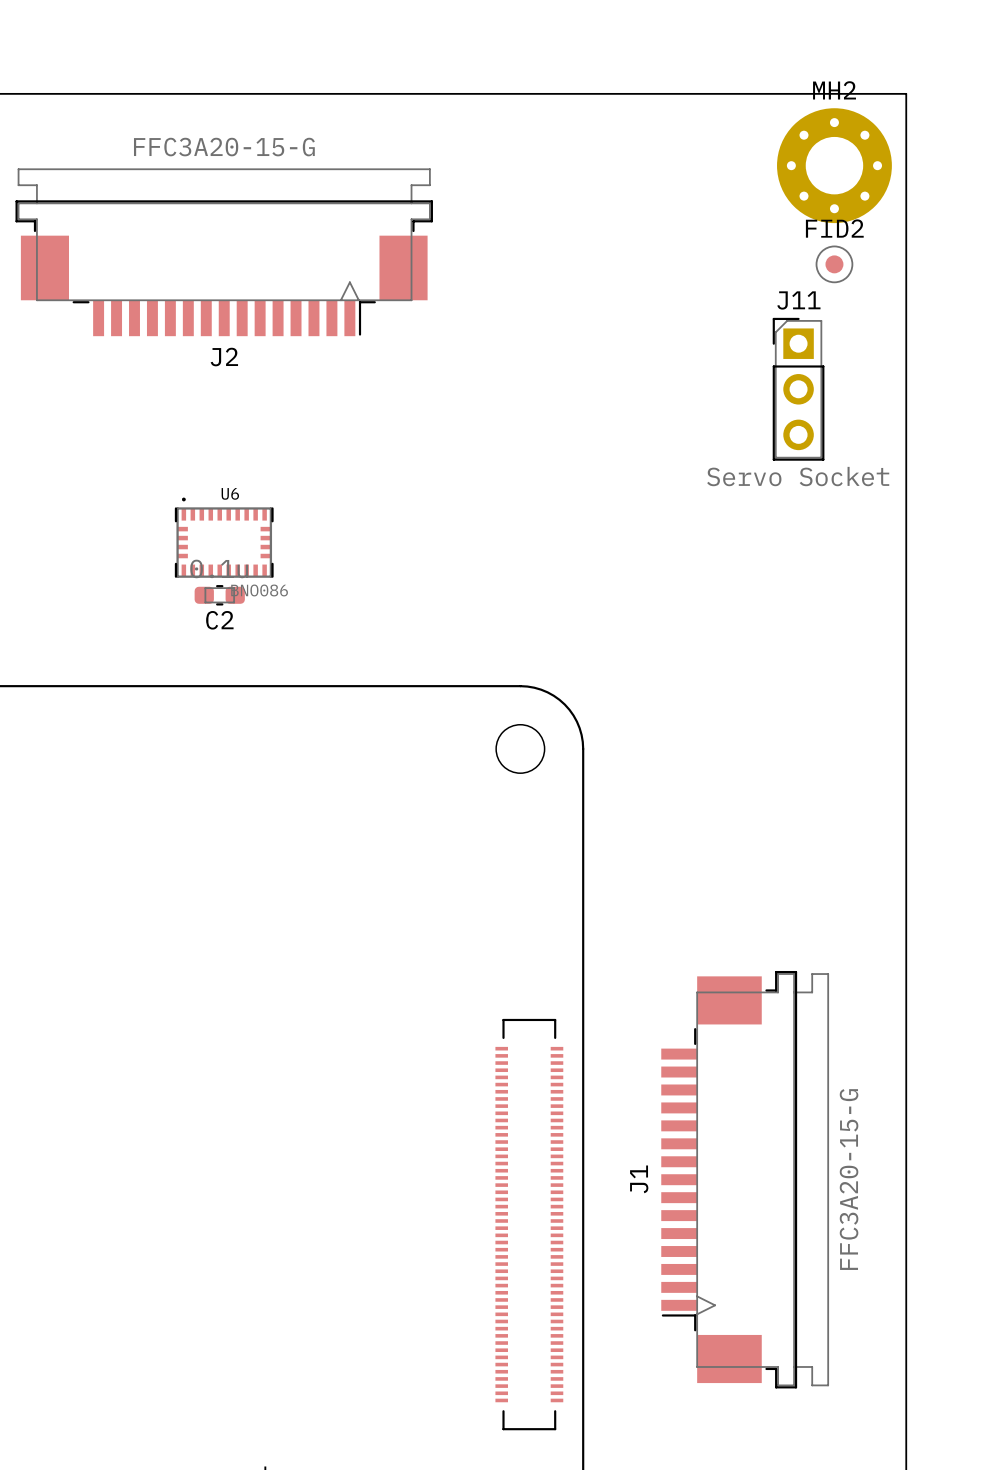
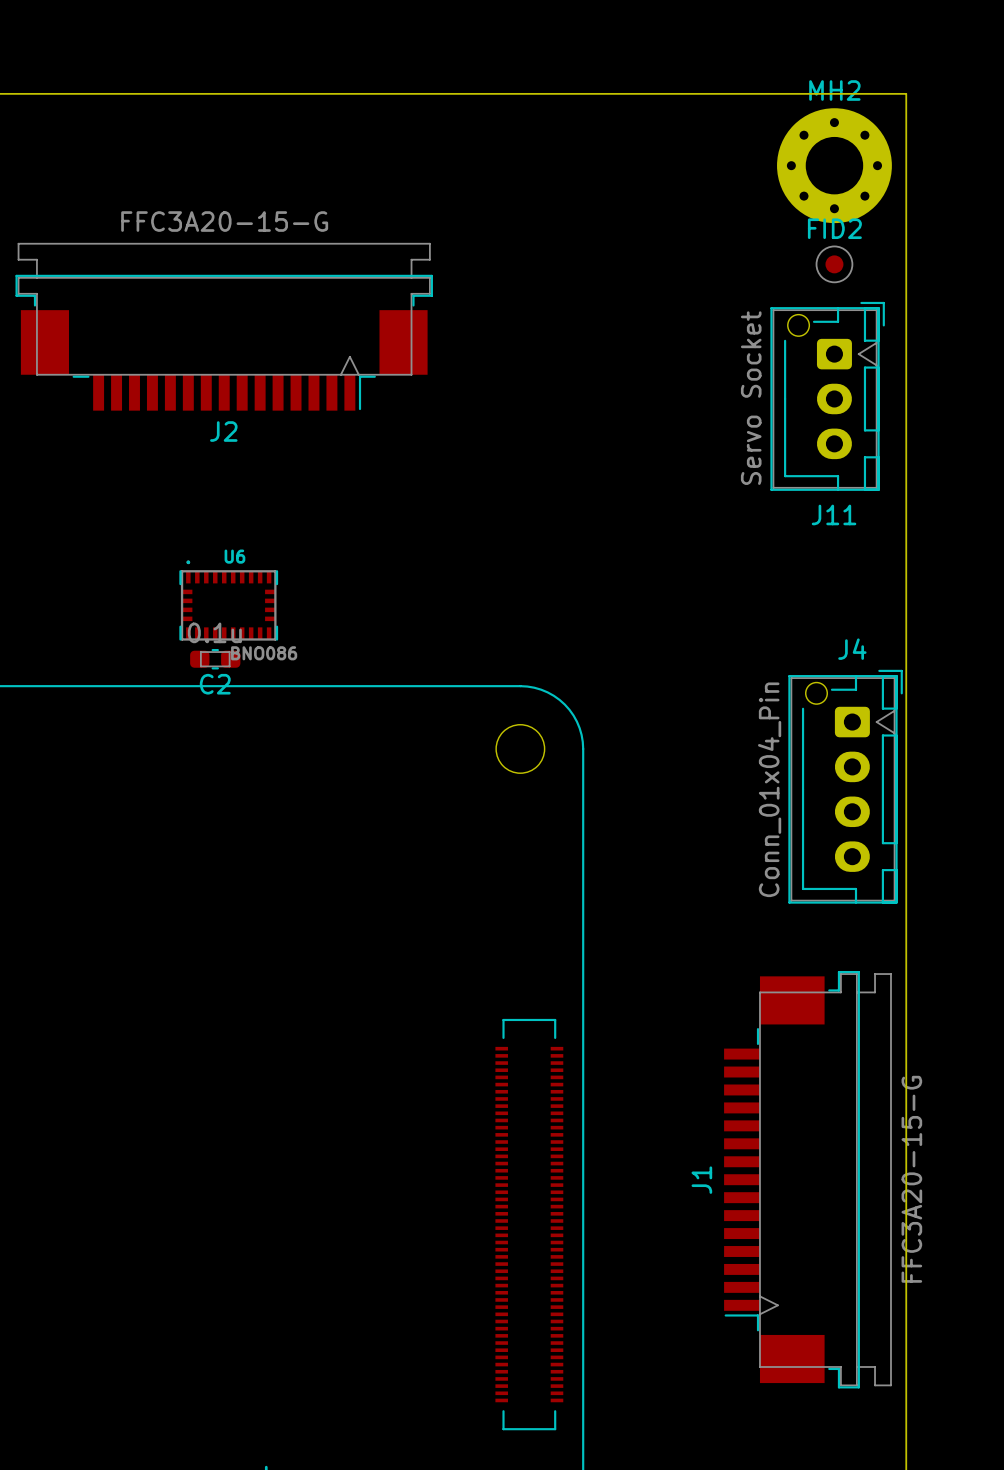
J2 position: (224, 252) -> (224, 326)
J11 name position: J11 (798, 300) -> J11 (834, 514)
J11 footprint: [772, 317, 825, 461] -> [770, 301, 885, 491]
J11 value position: Servo Socket (798, 476) -> Servo Socket (751, 398)
U6 position: (224, 537) -> (228, 600)
C2 position: (219, 595) -> (215, 659)
J4: none -> Conn_01x04_Pin (845, 786)
J1 position: (745, 1179) -> (807, 1179)

